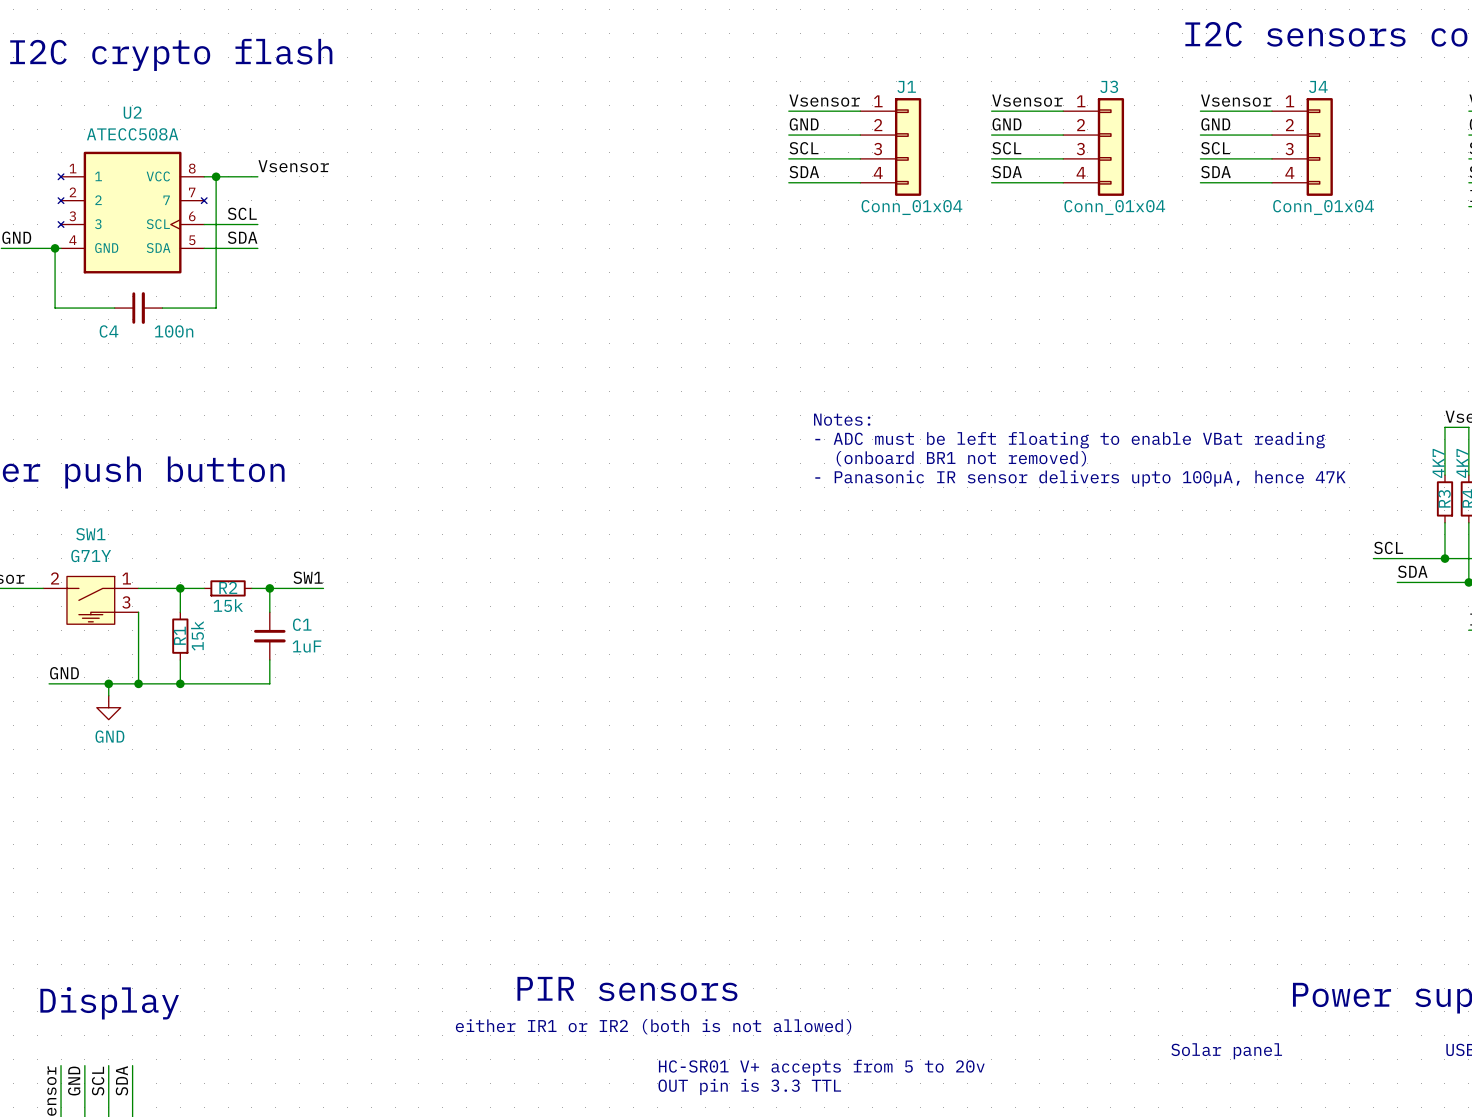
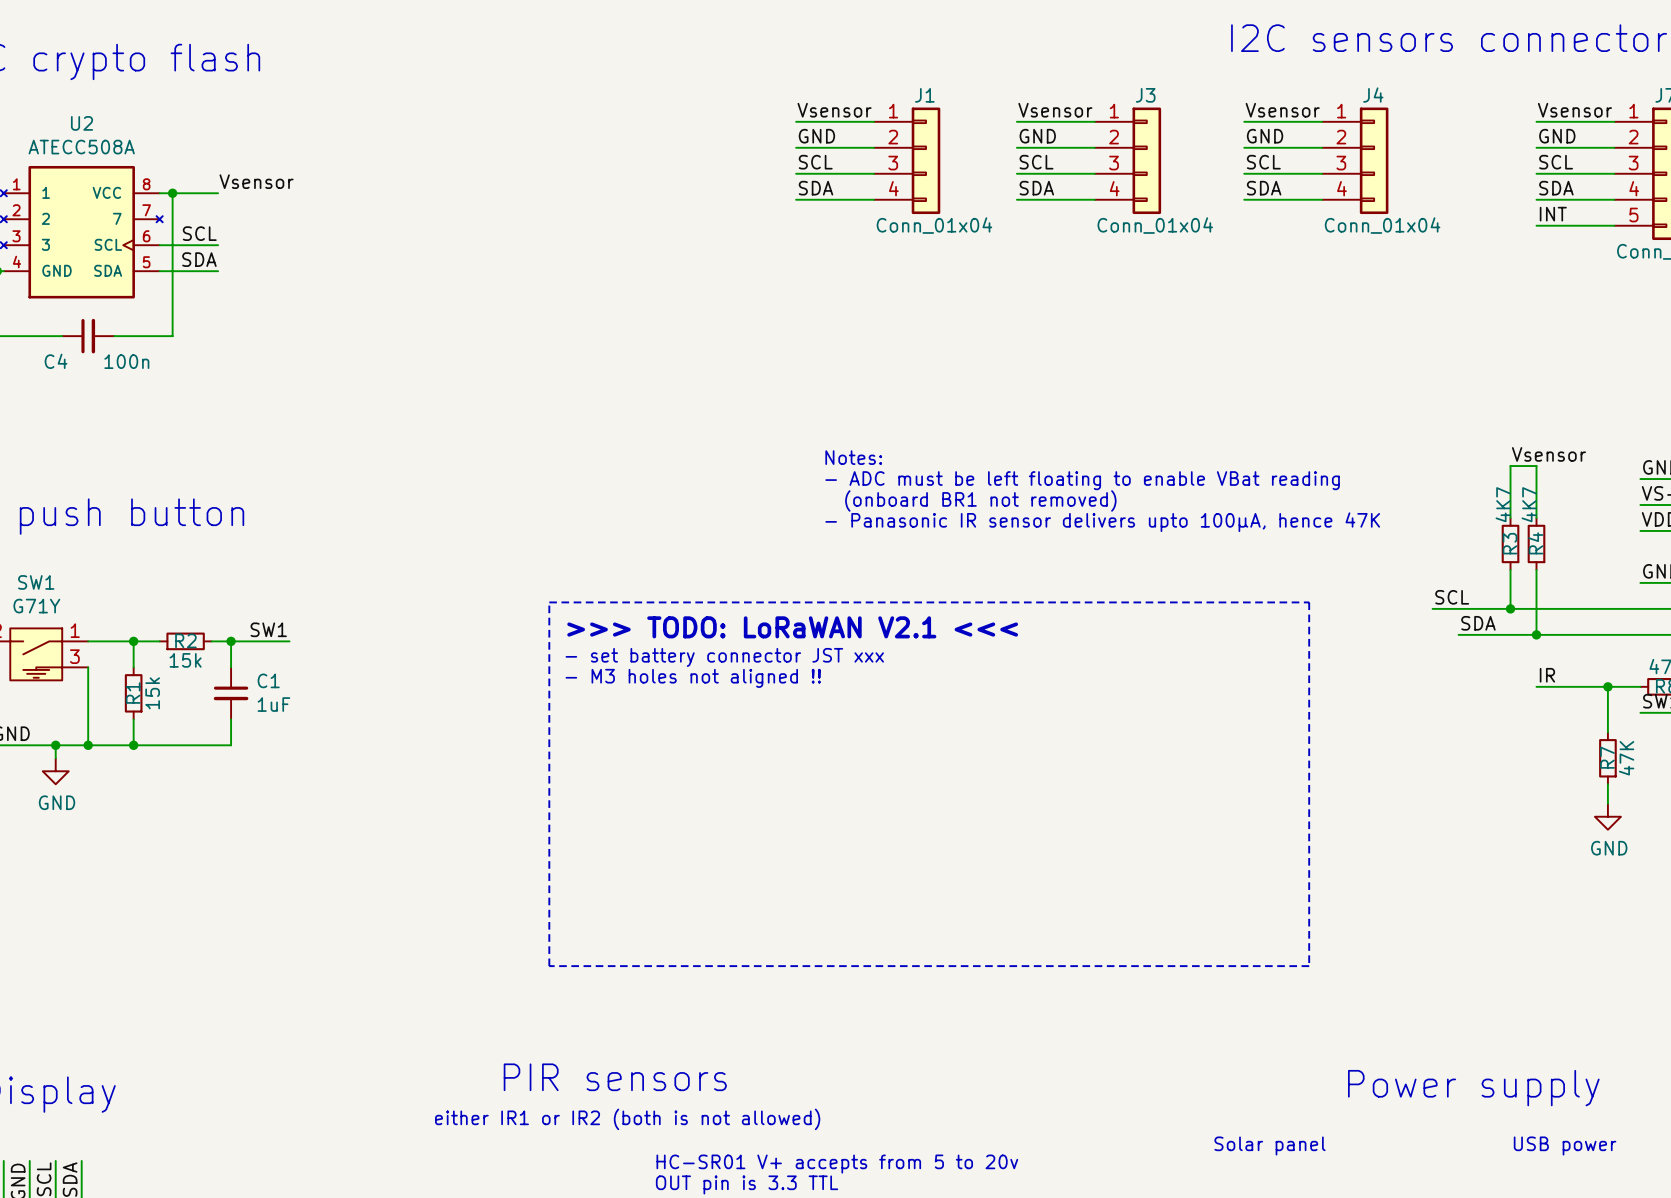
line: none -> (549, 602) (1309, 602) (1309, 966) (549, 966) (549, 602)
text: none -> >>> TODO: LoRaWAN V2.1 <<< (792, 627)
text: none -> - set battery connector JST xxx (724, 657)
text: none -> - M3 holes not aligned !! (693, 678)

